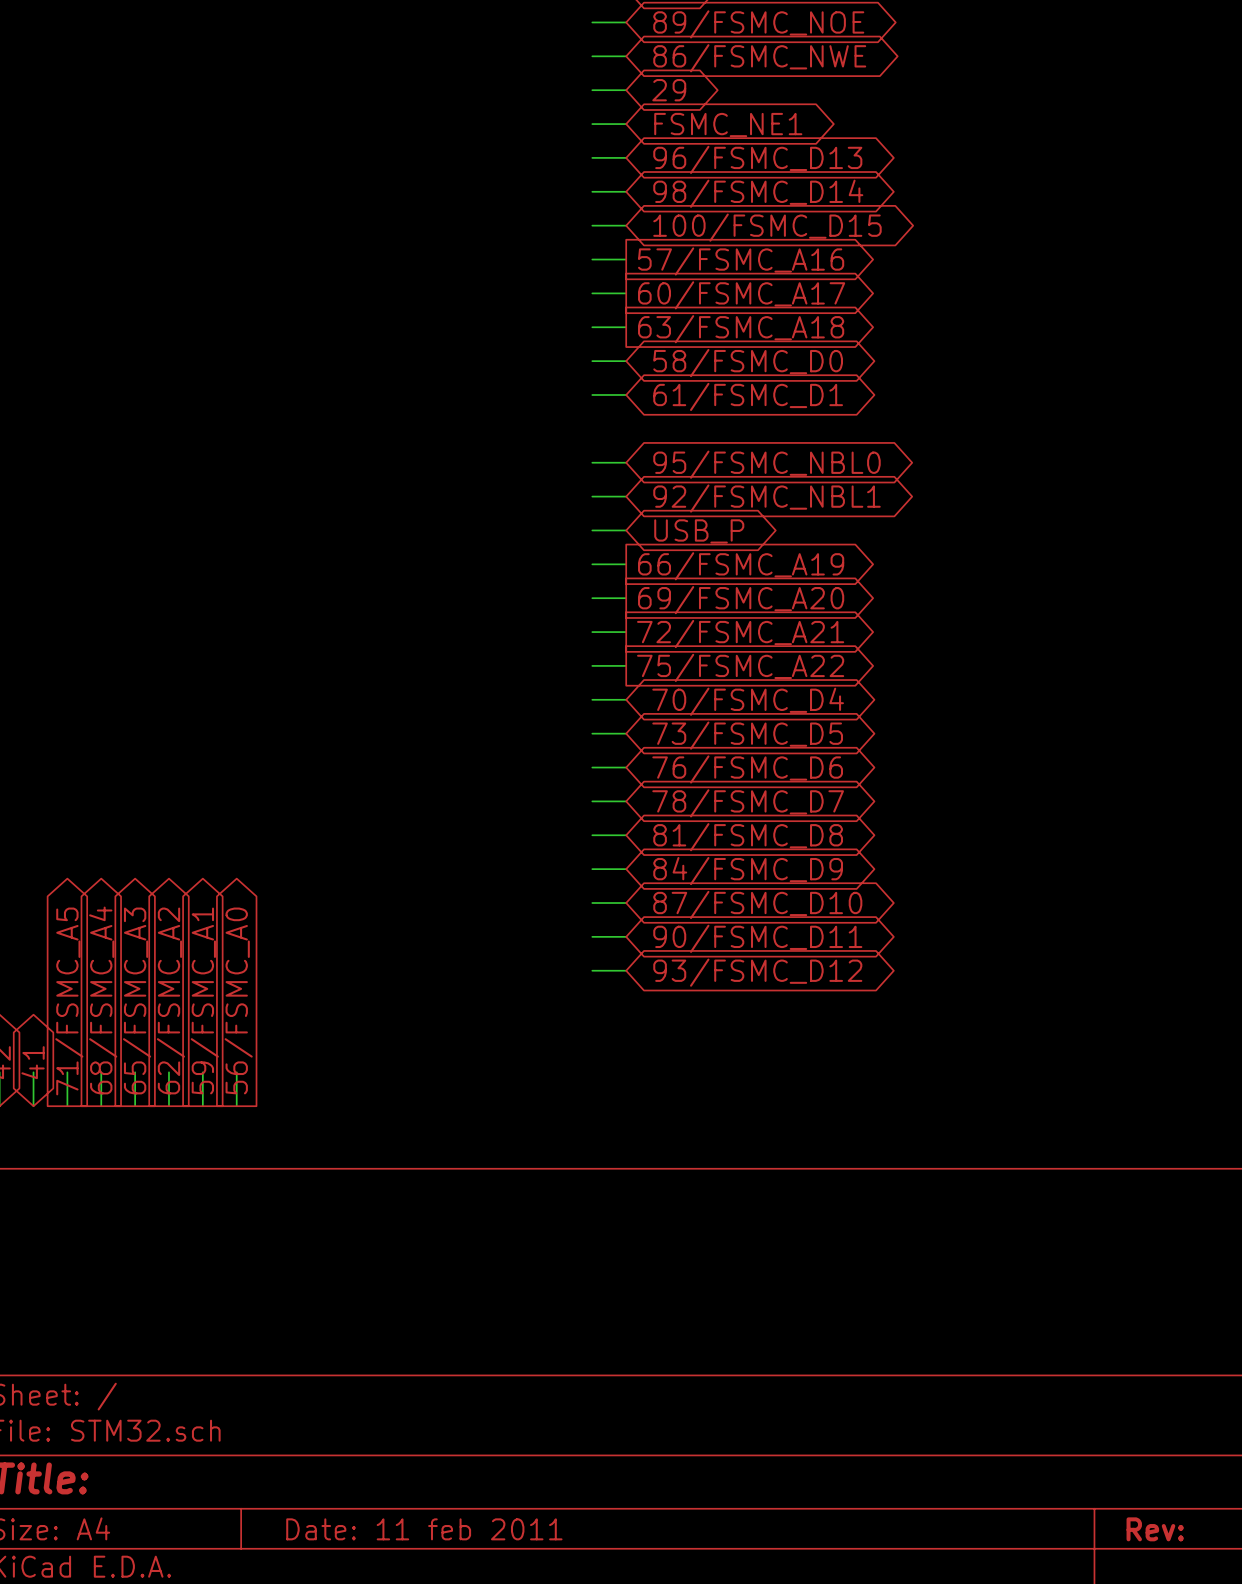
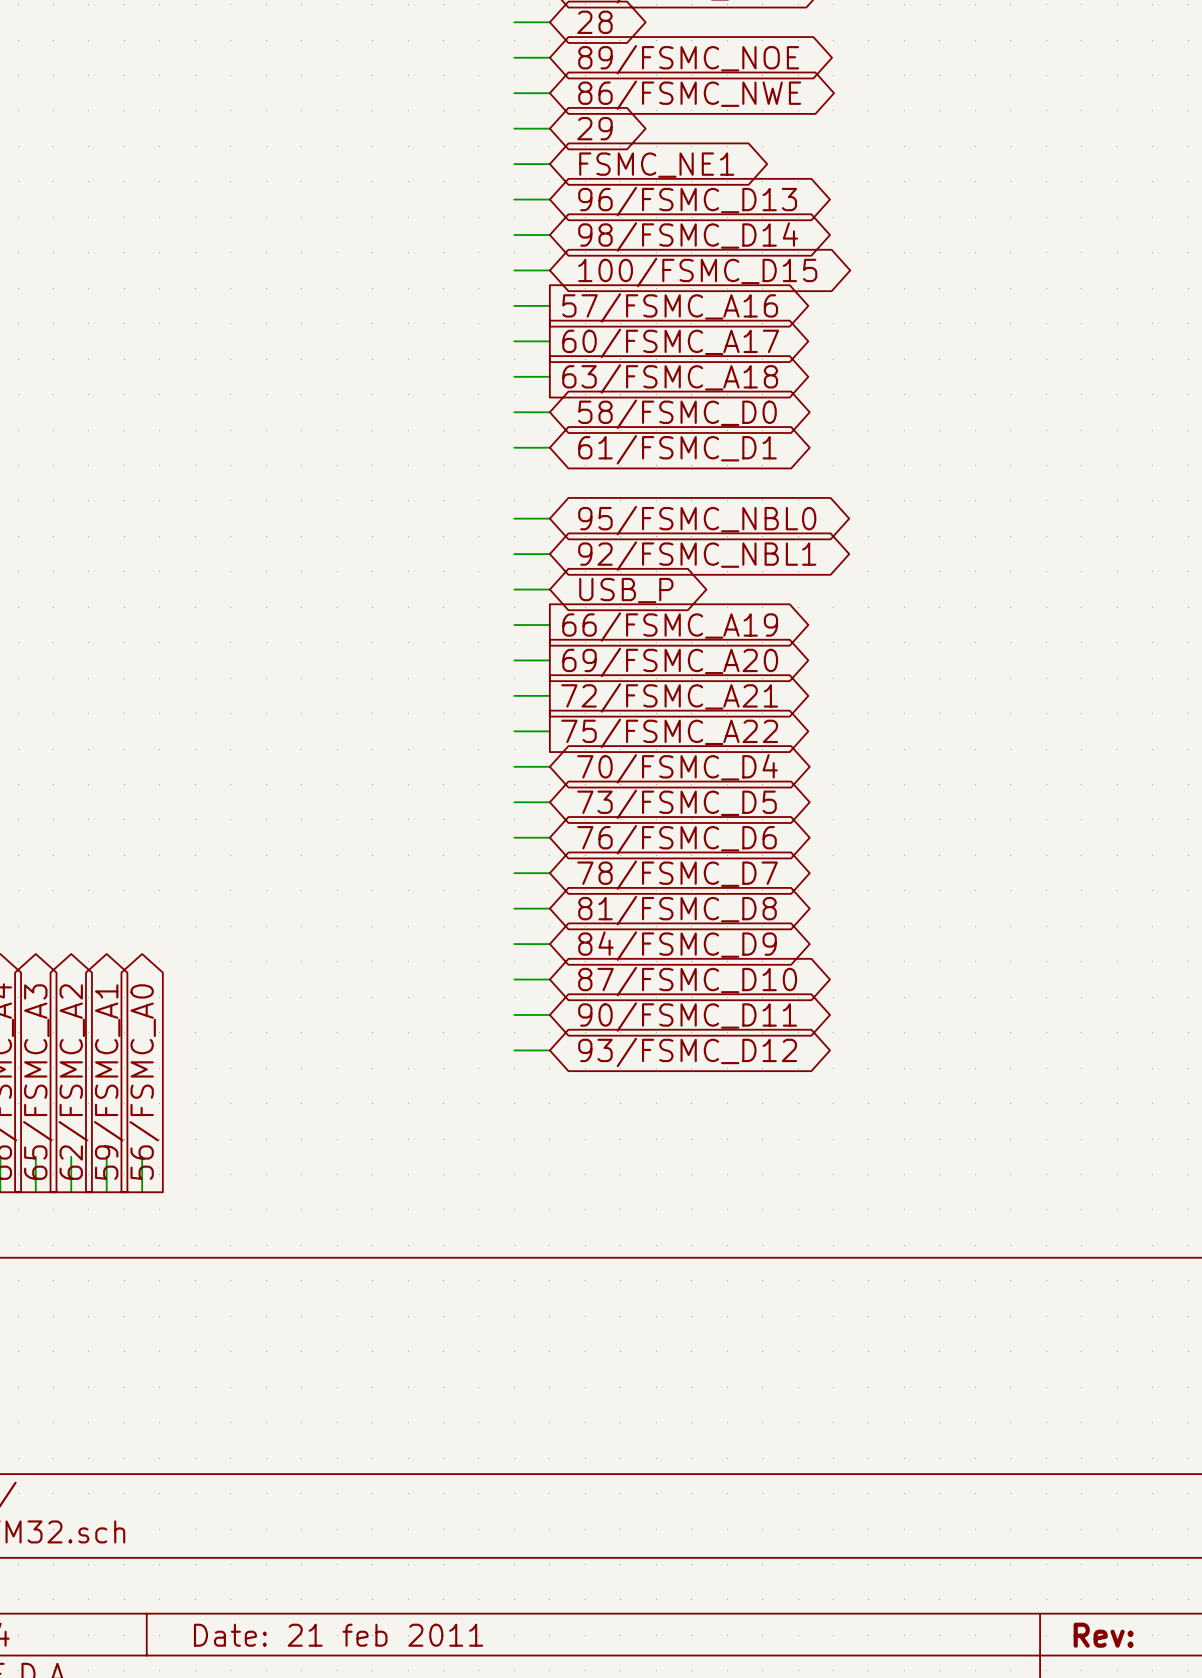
title block: Date: 11 feb 2011 (424, 1529) -> Date: 21 feb 2011 (338, 1635)

